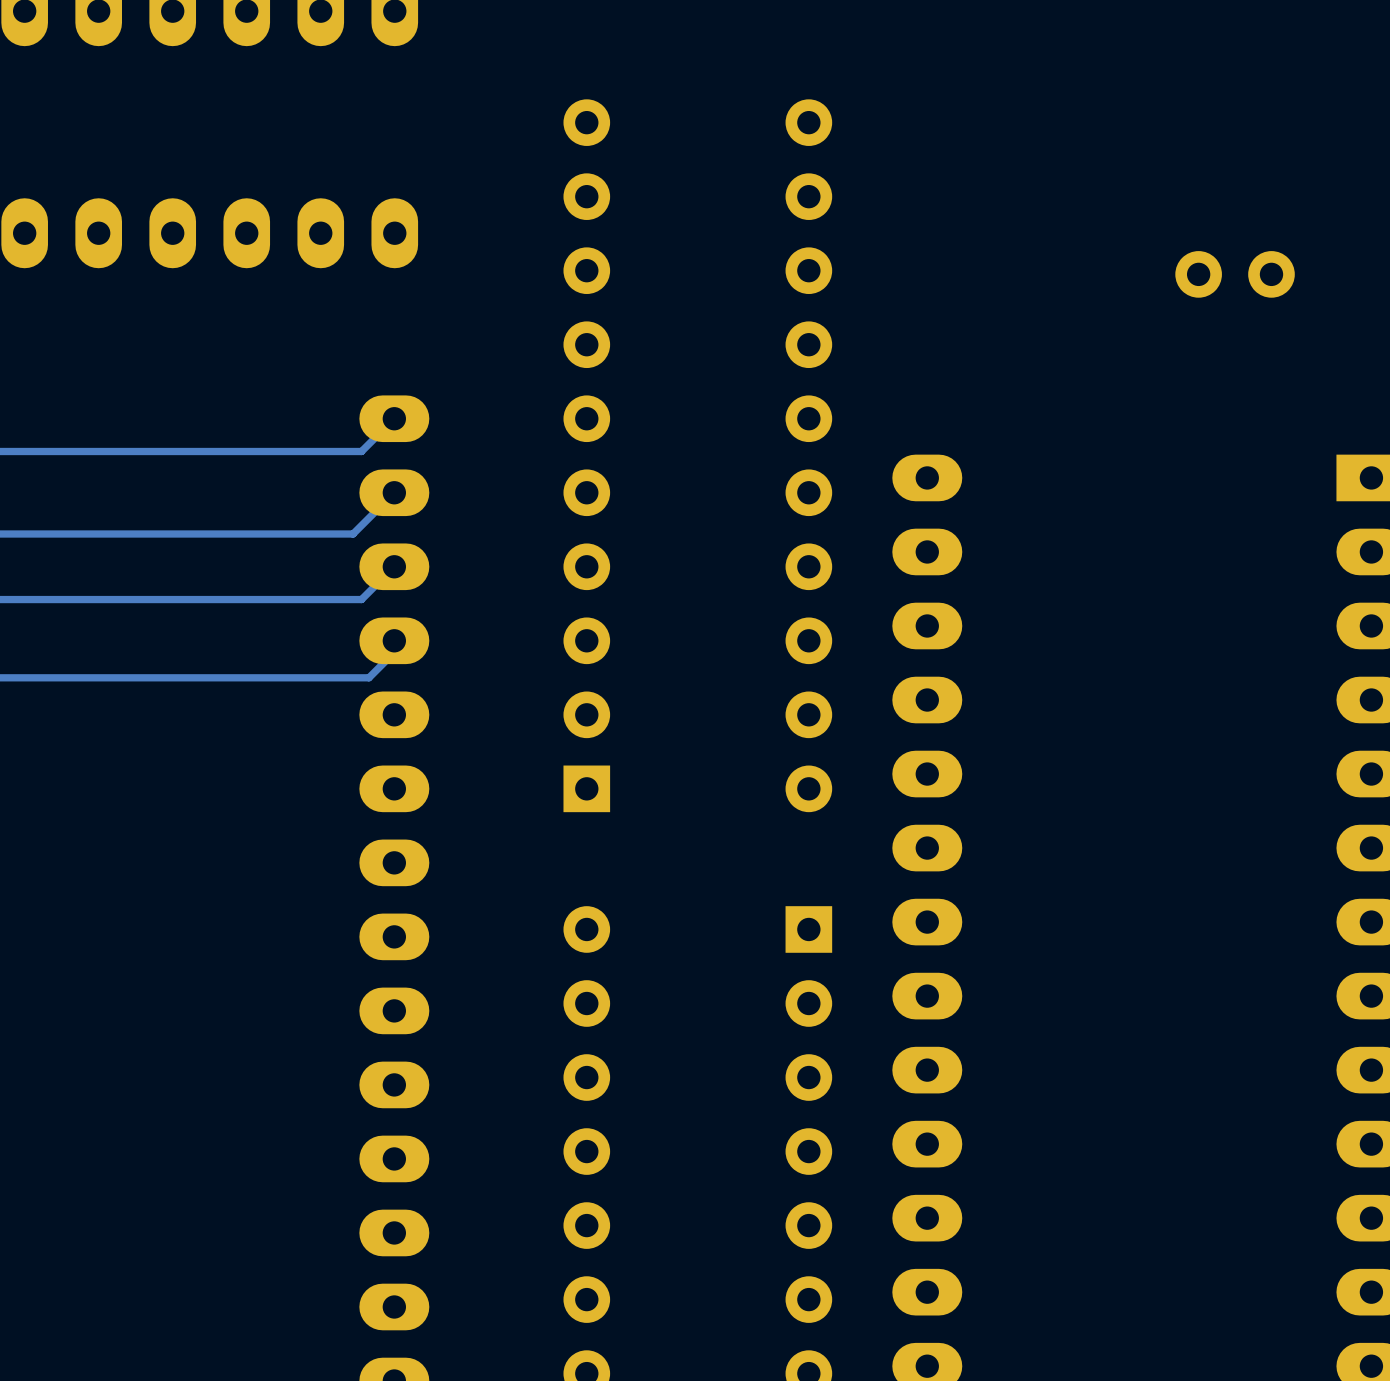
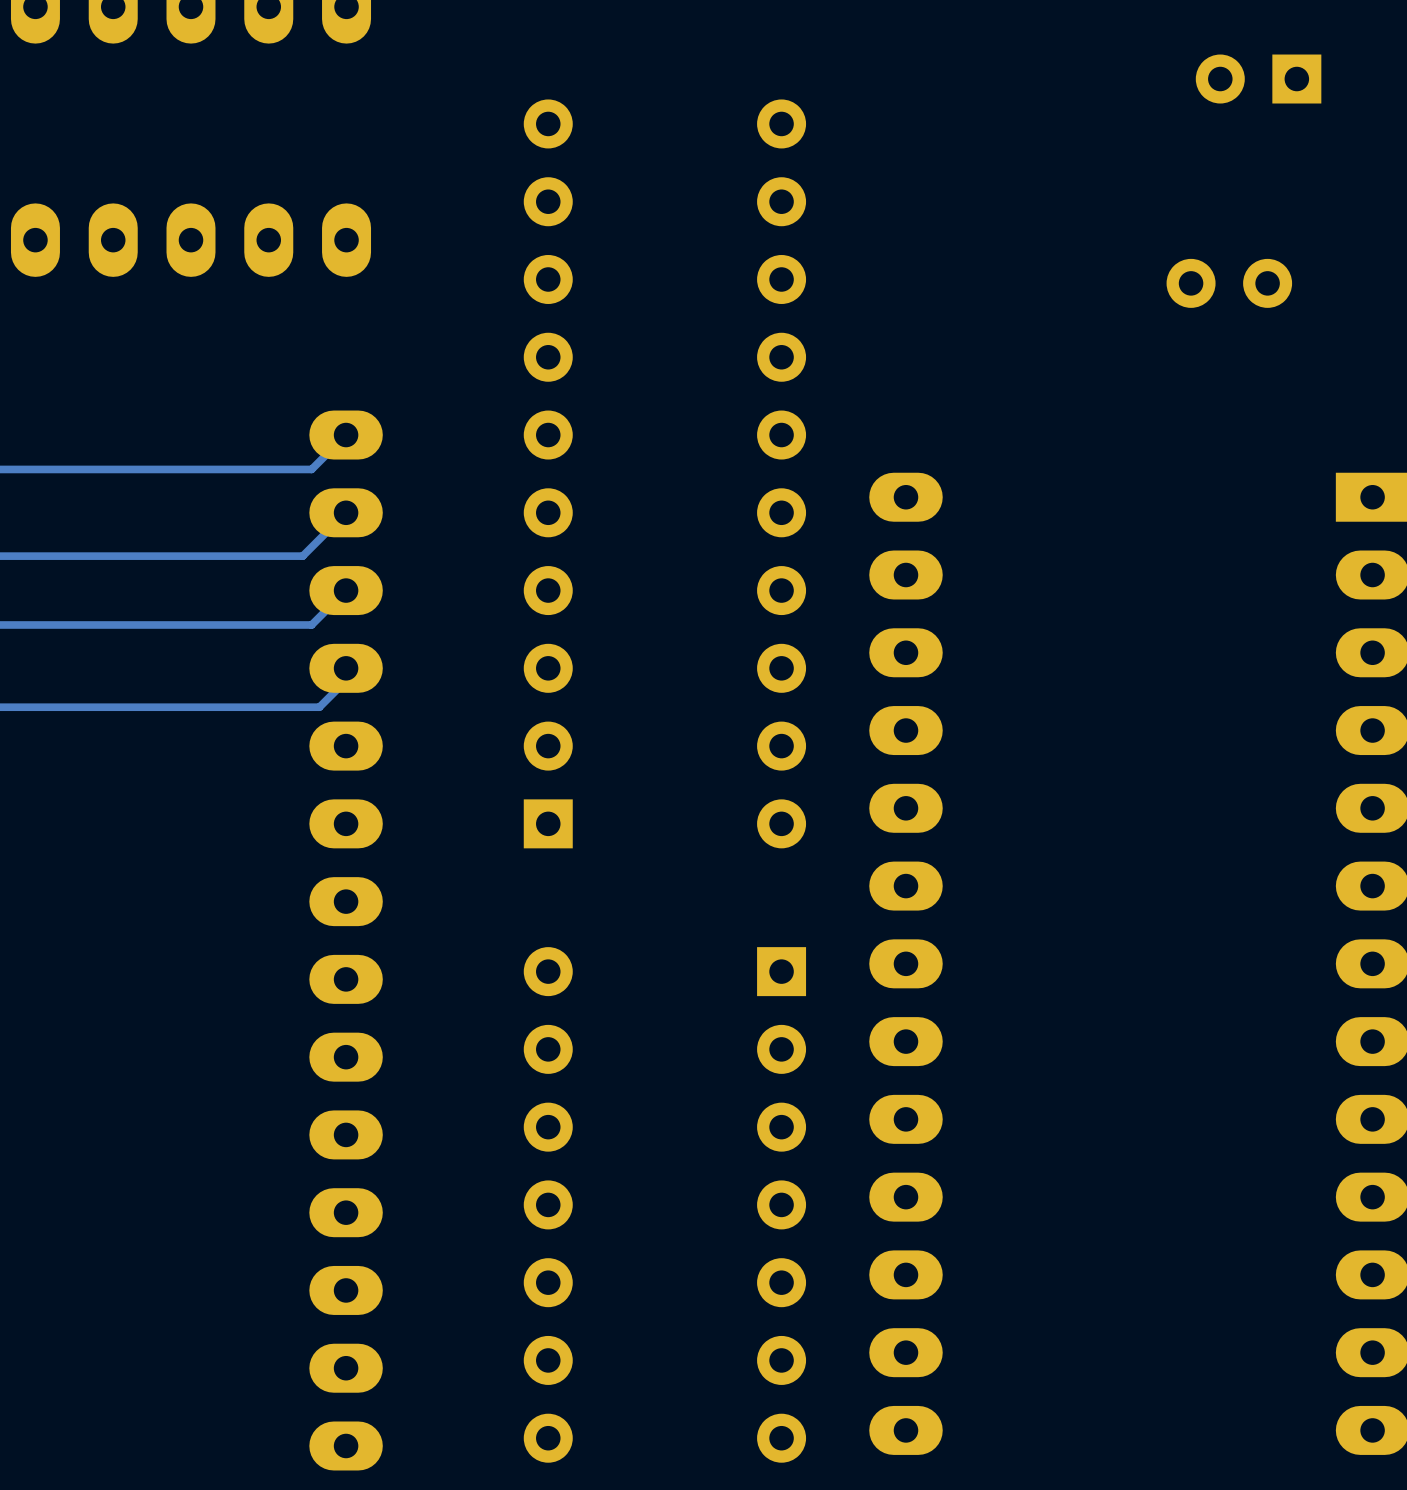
part: none -> (1258, 79)

